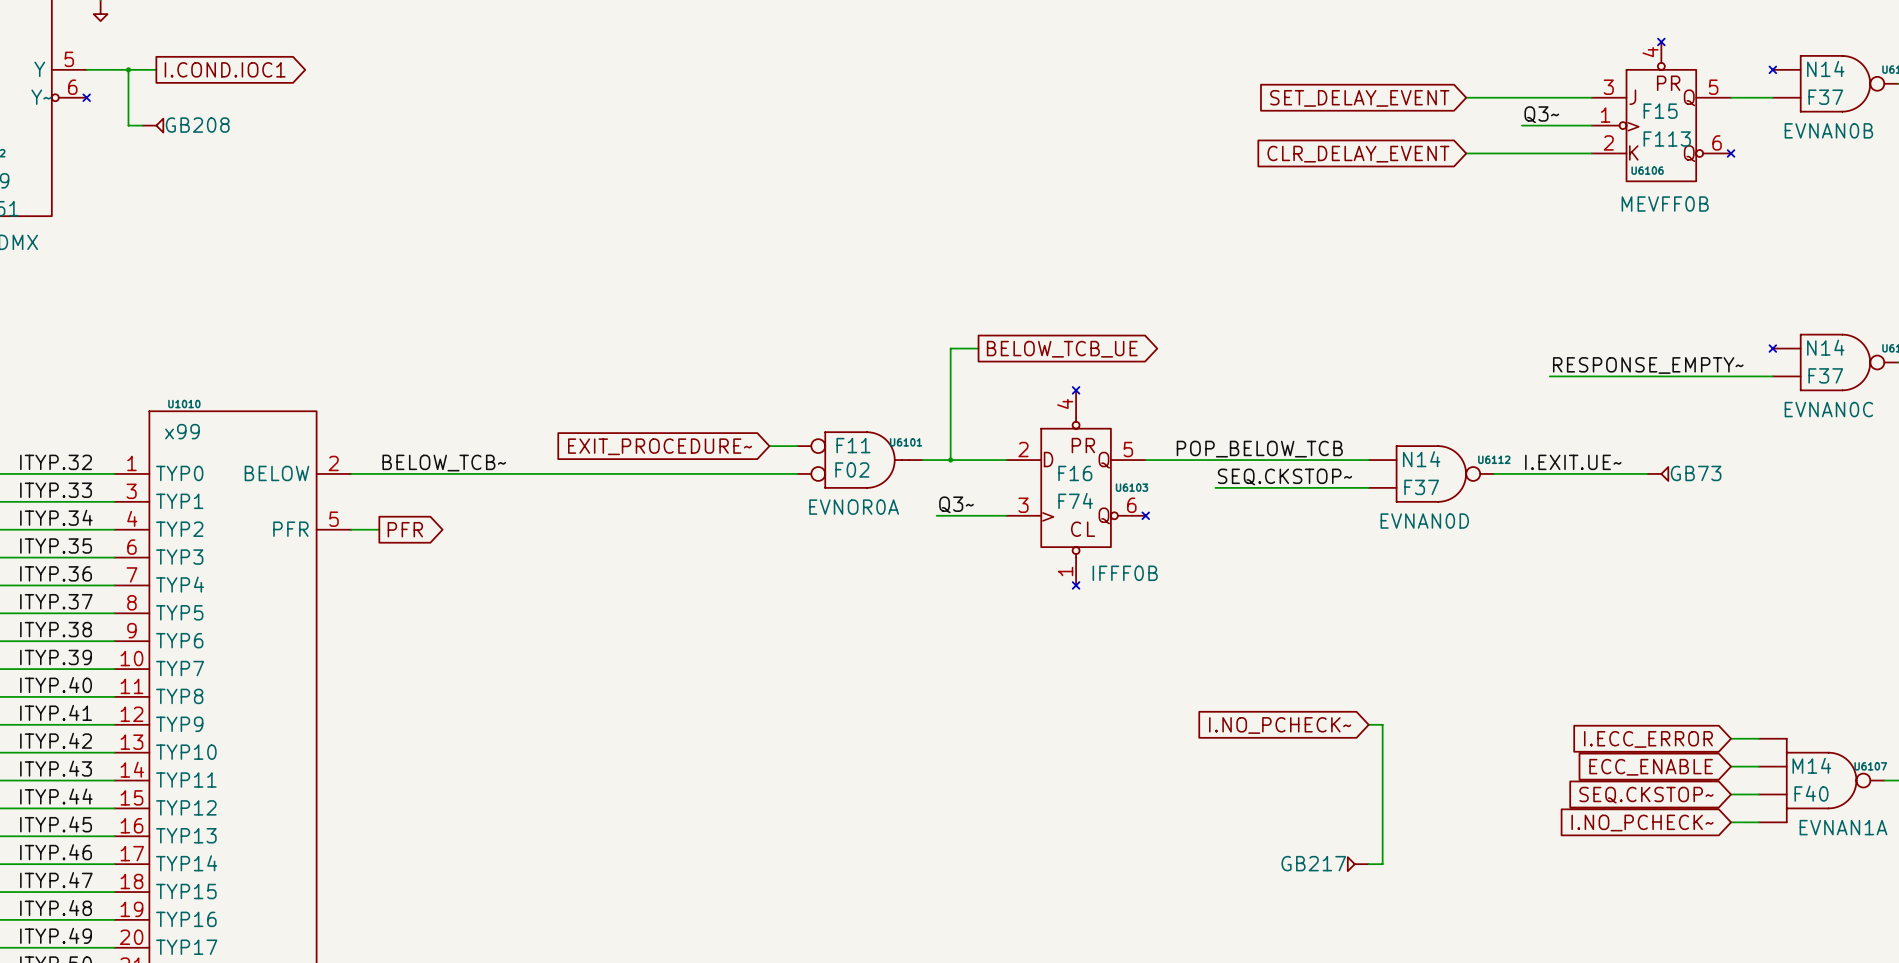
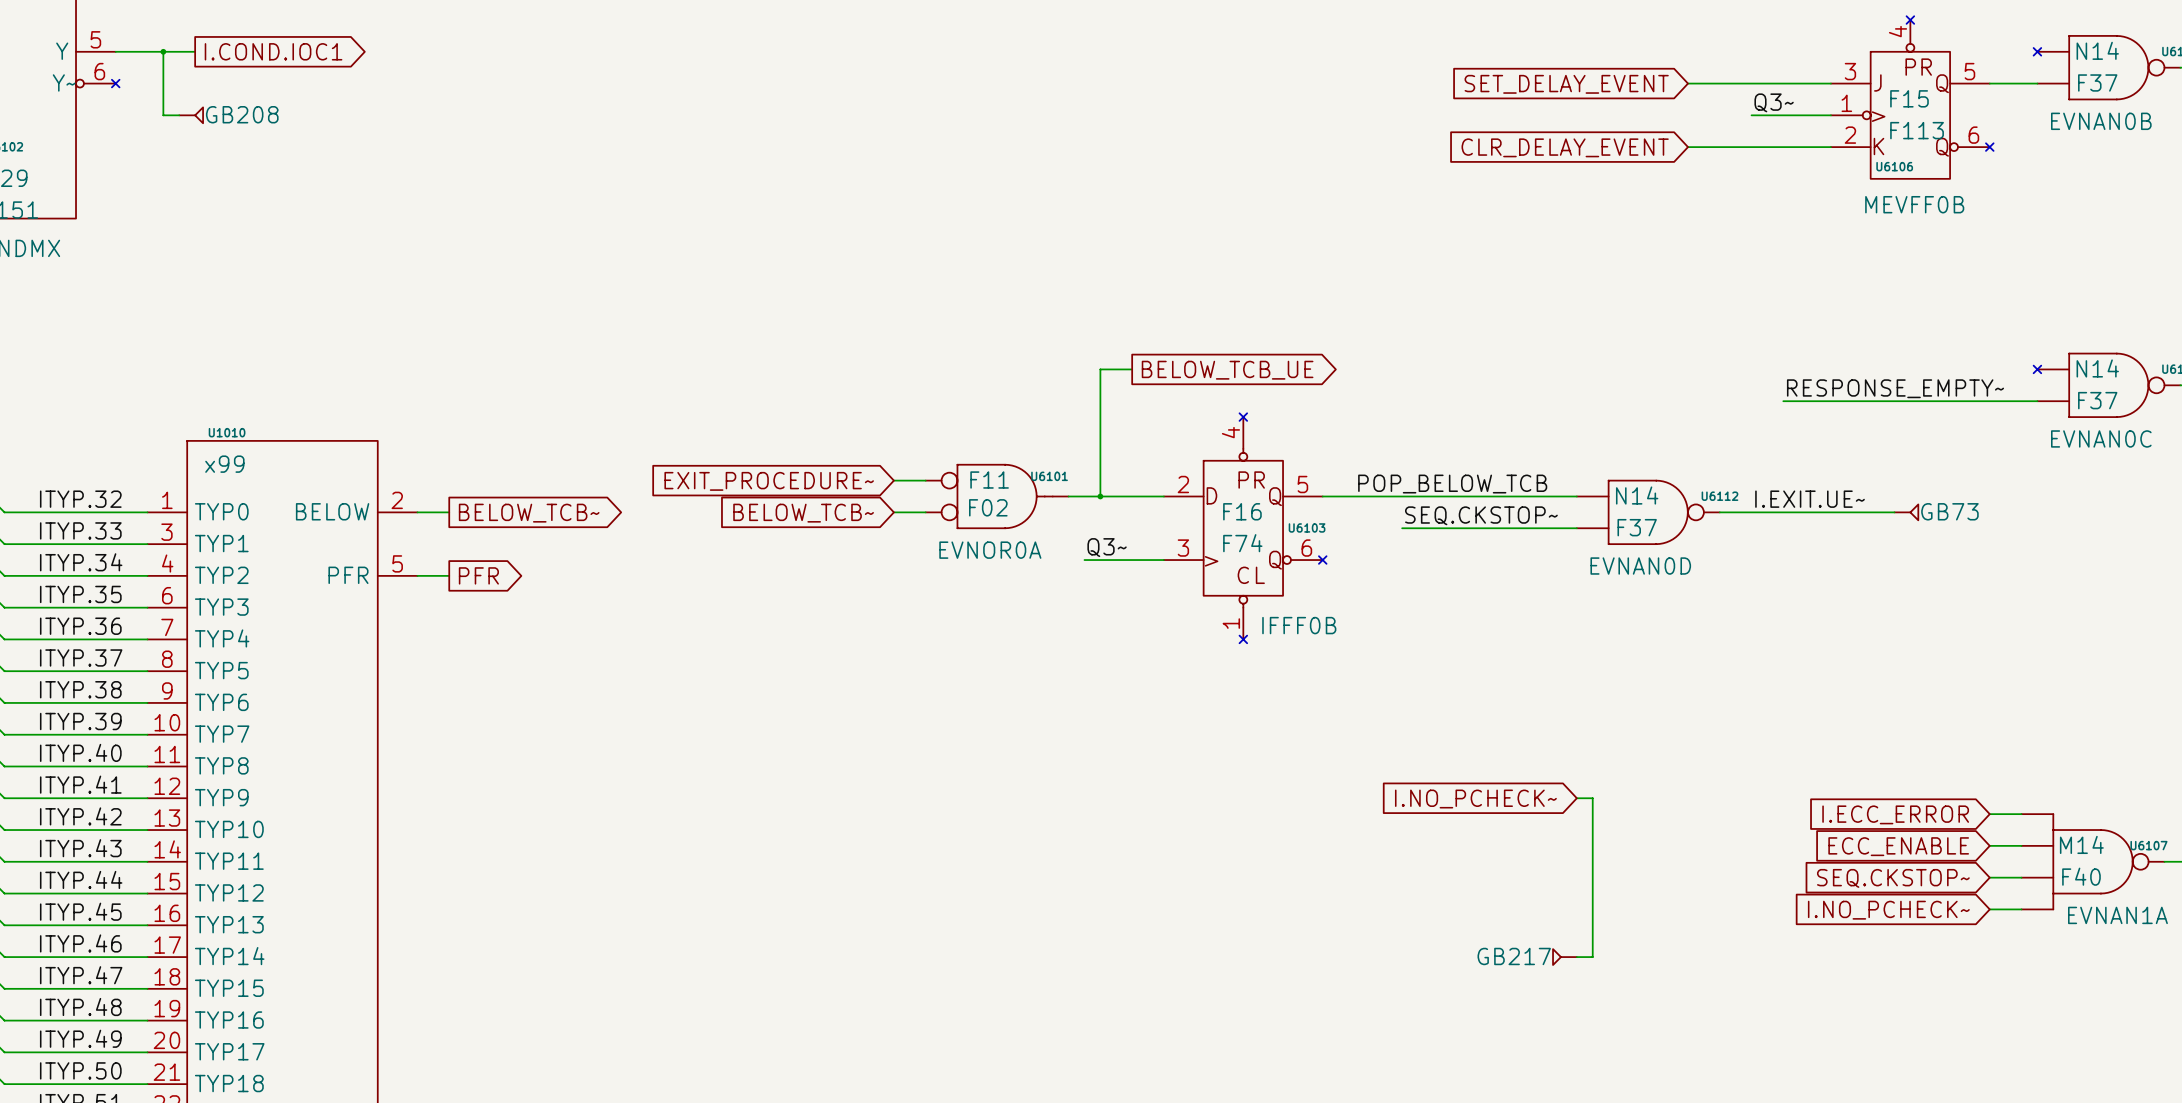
label: BELOW_TCB~ (444, 463) -> none
wire: (379, 473) (769, 473) -> none
global label: none -> BELOW_TCB~ (529, 513)
global label: none -> BELOW_TCB~ (803, 513)

